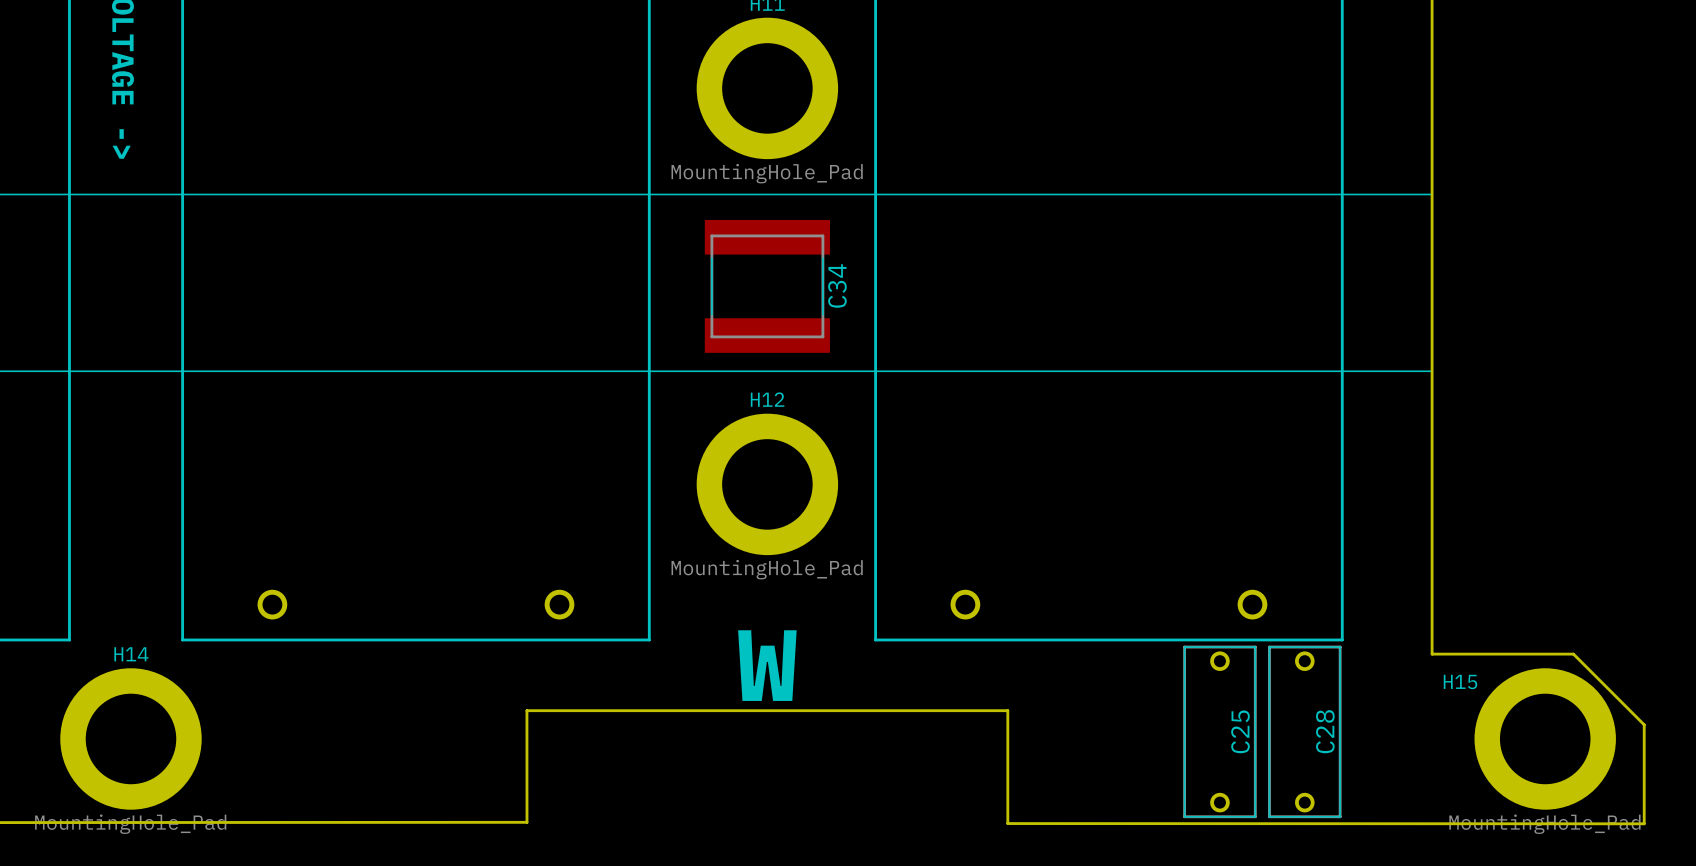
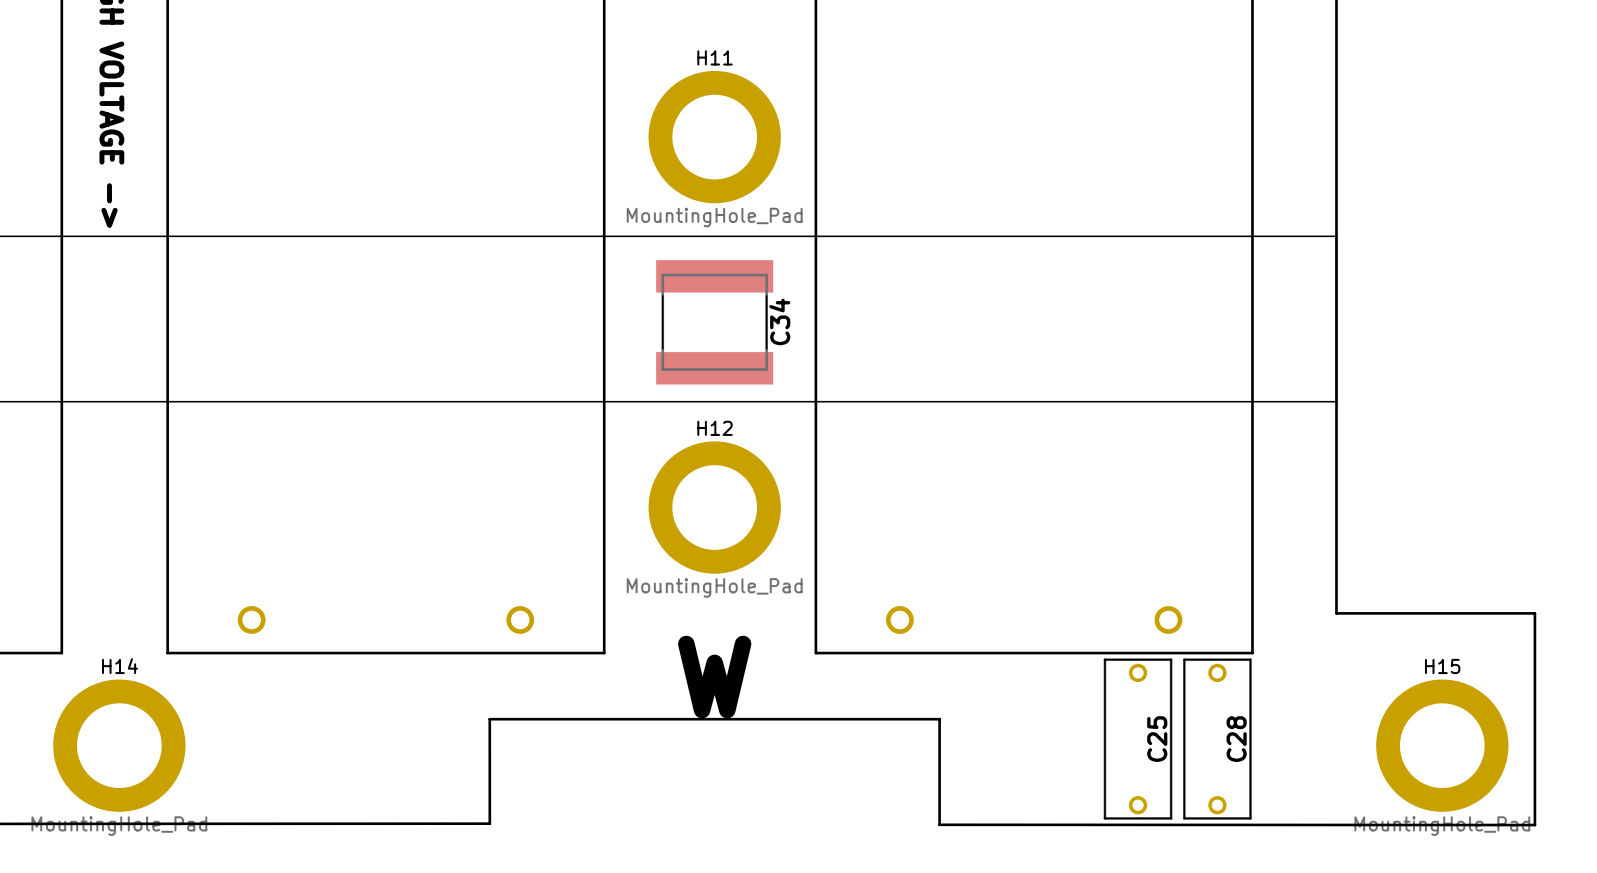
board edge: (1432, 597) (1432, 654) (1573, 654) (1644, 724) -> (1336, 613) (1534, 613) (1534, 732)
H15 name position: H15 (1460, 681) -> H15 (1442, 666)

